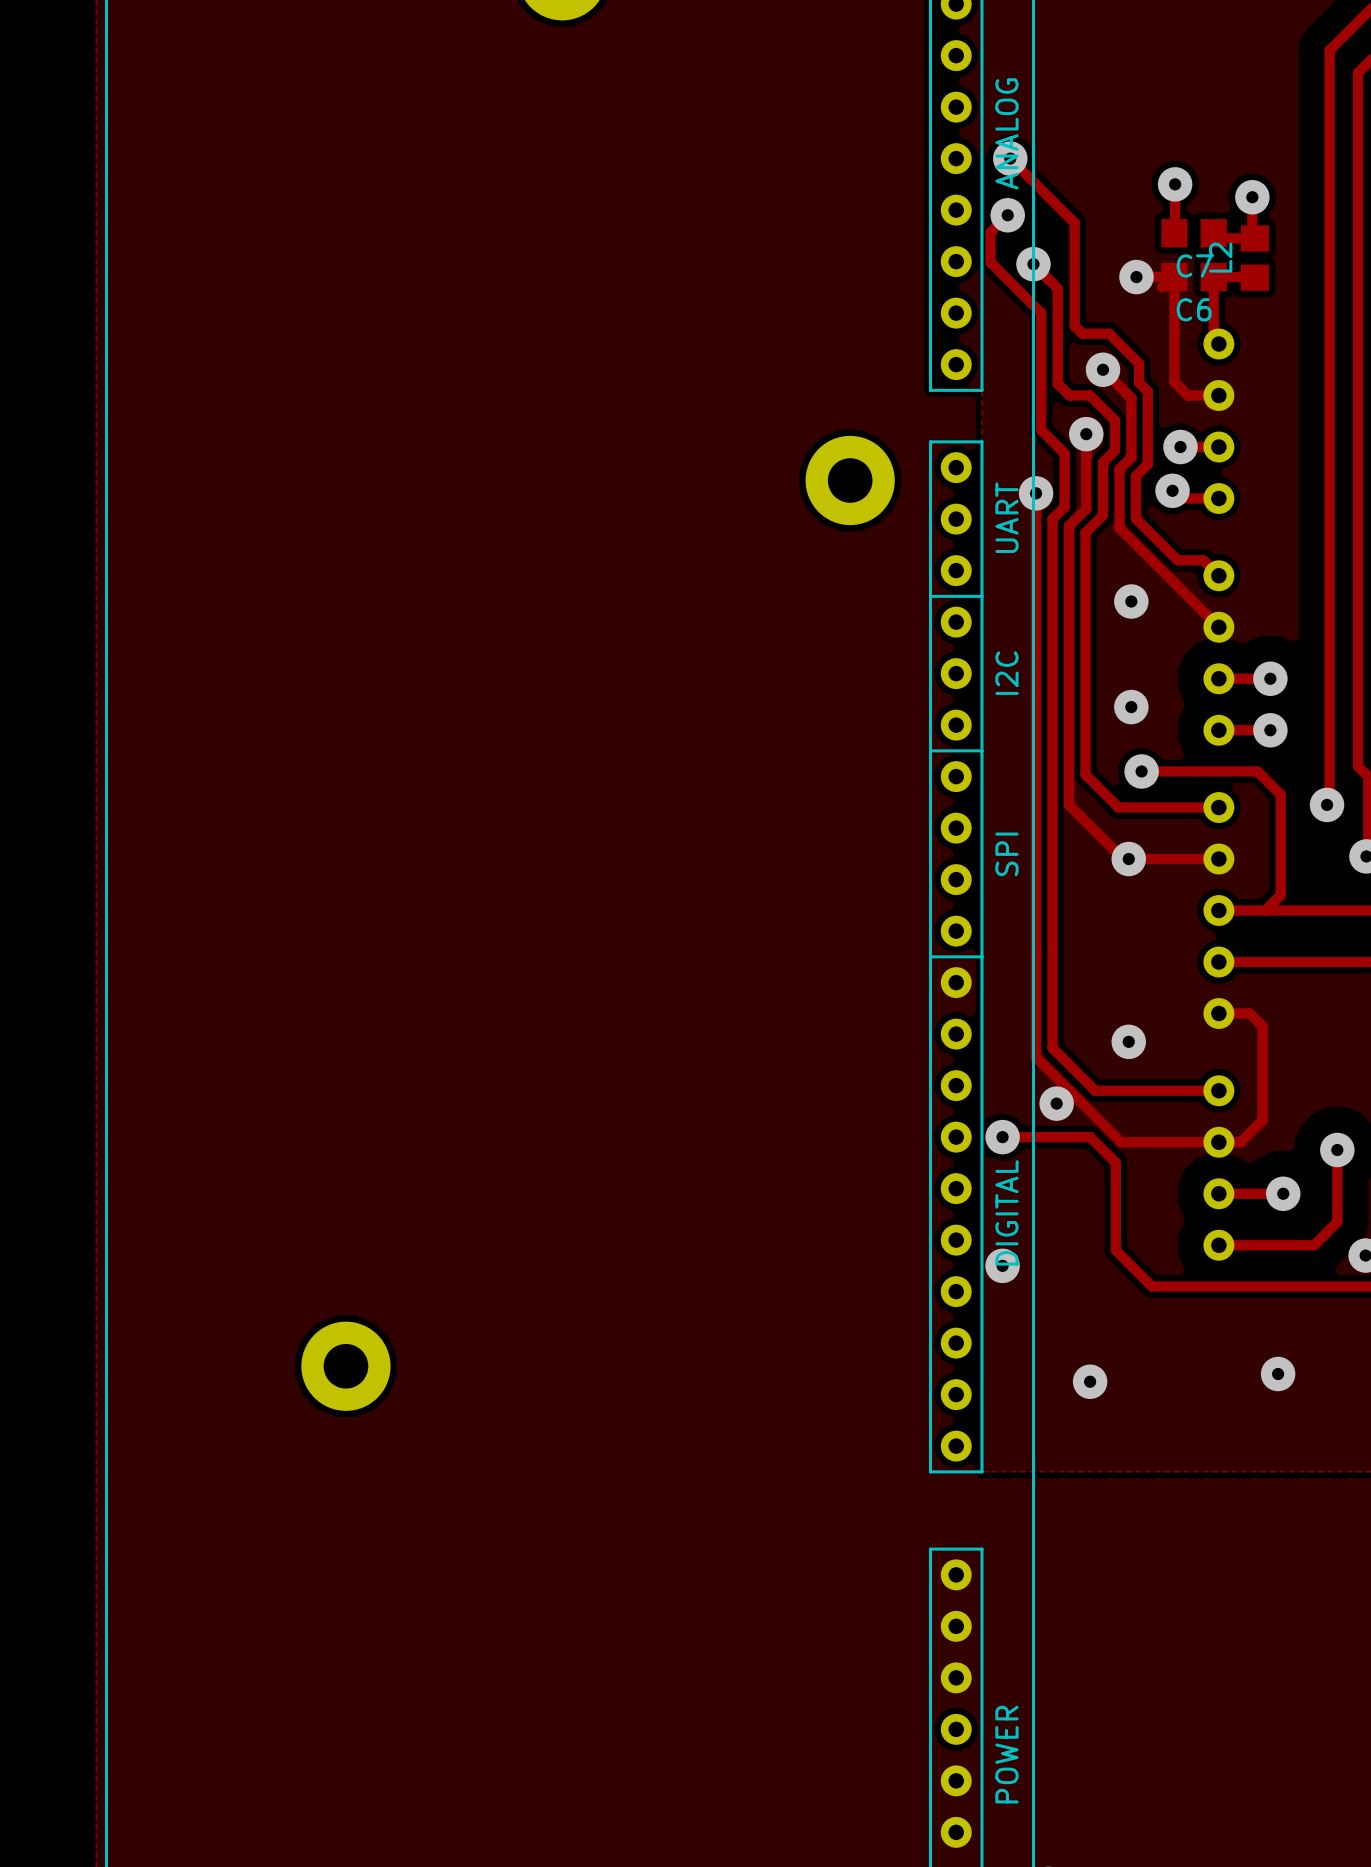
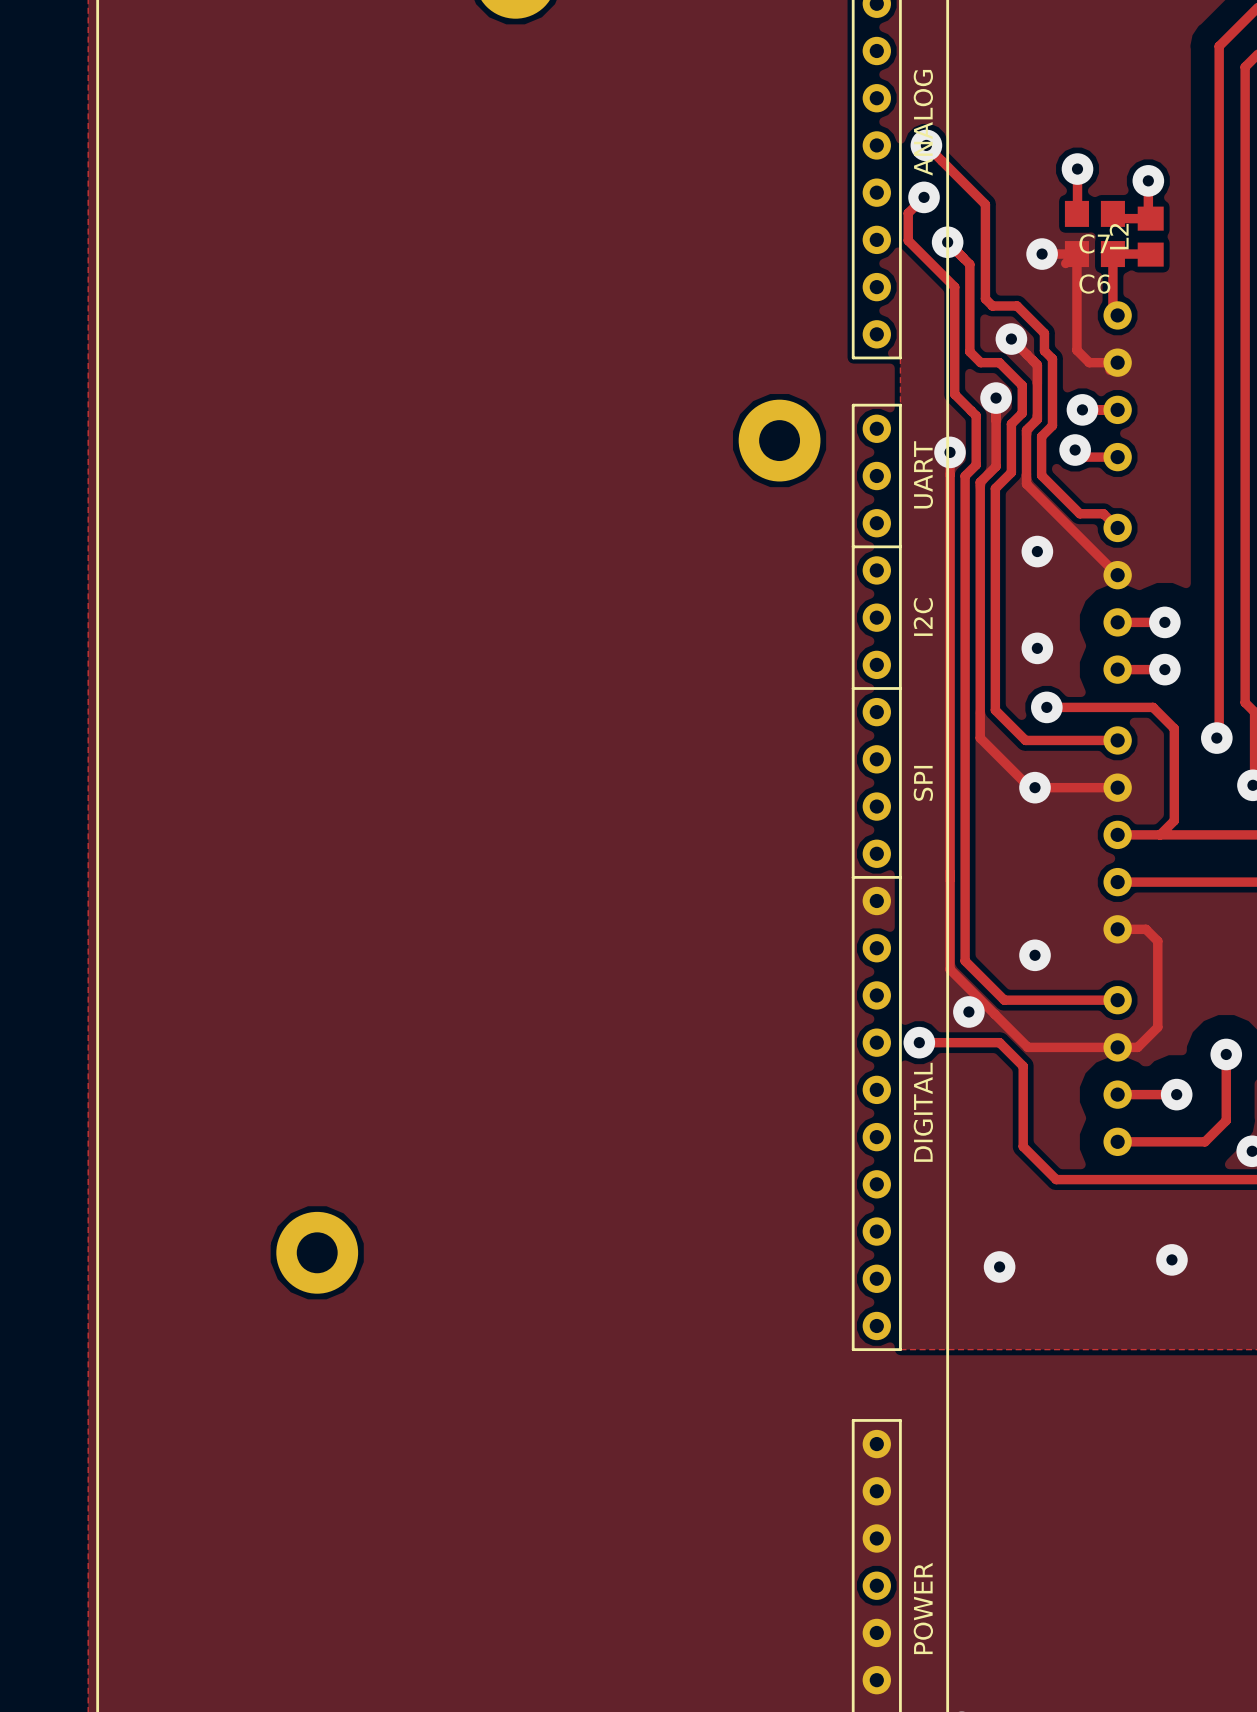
via: (1002, 1265) -> none

